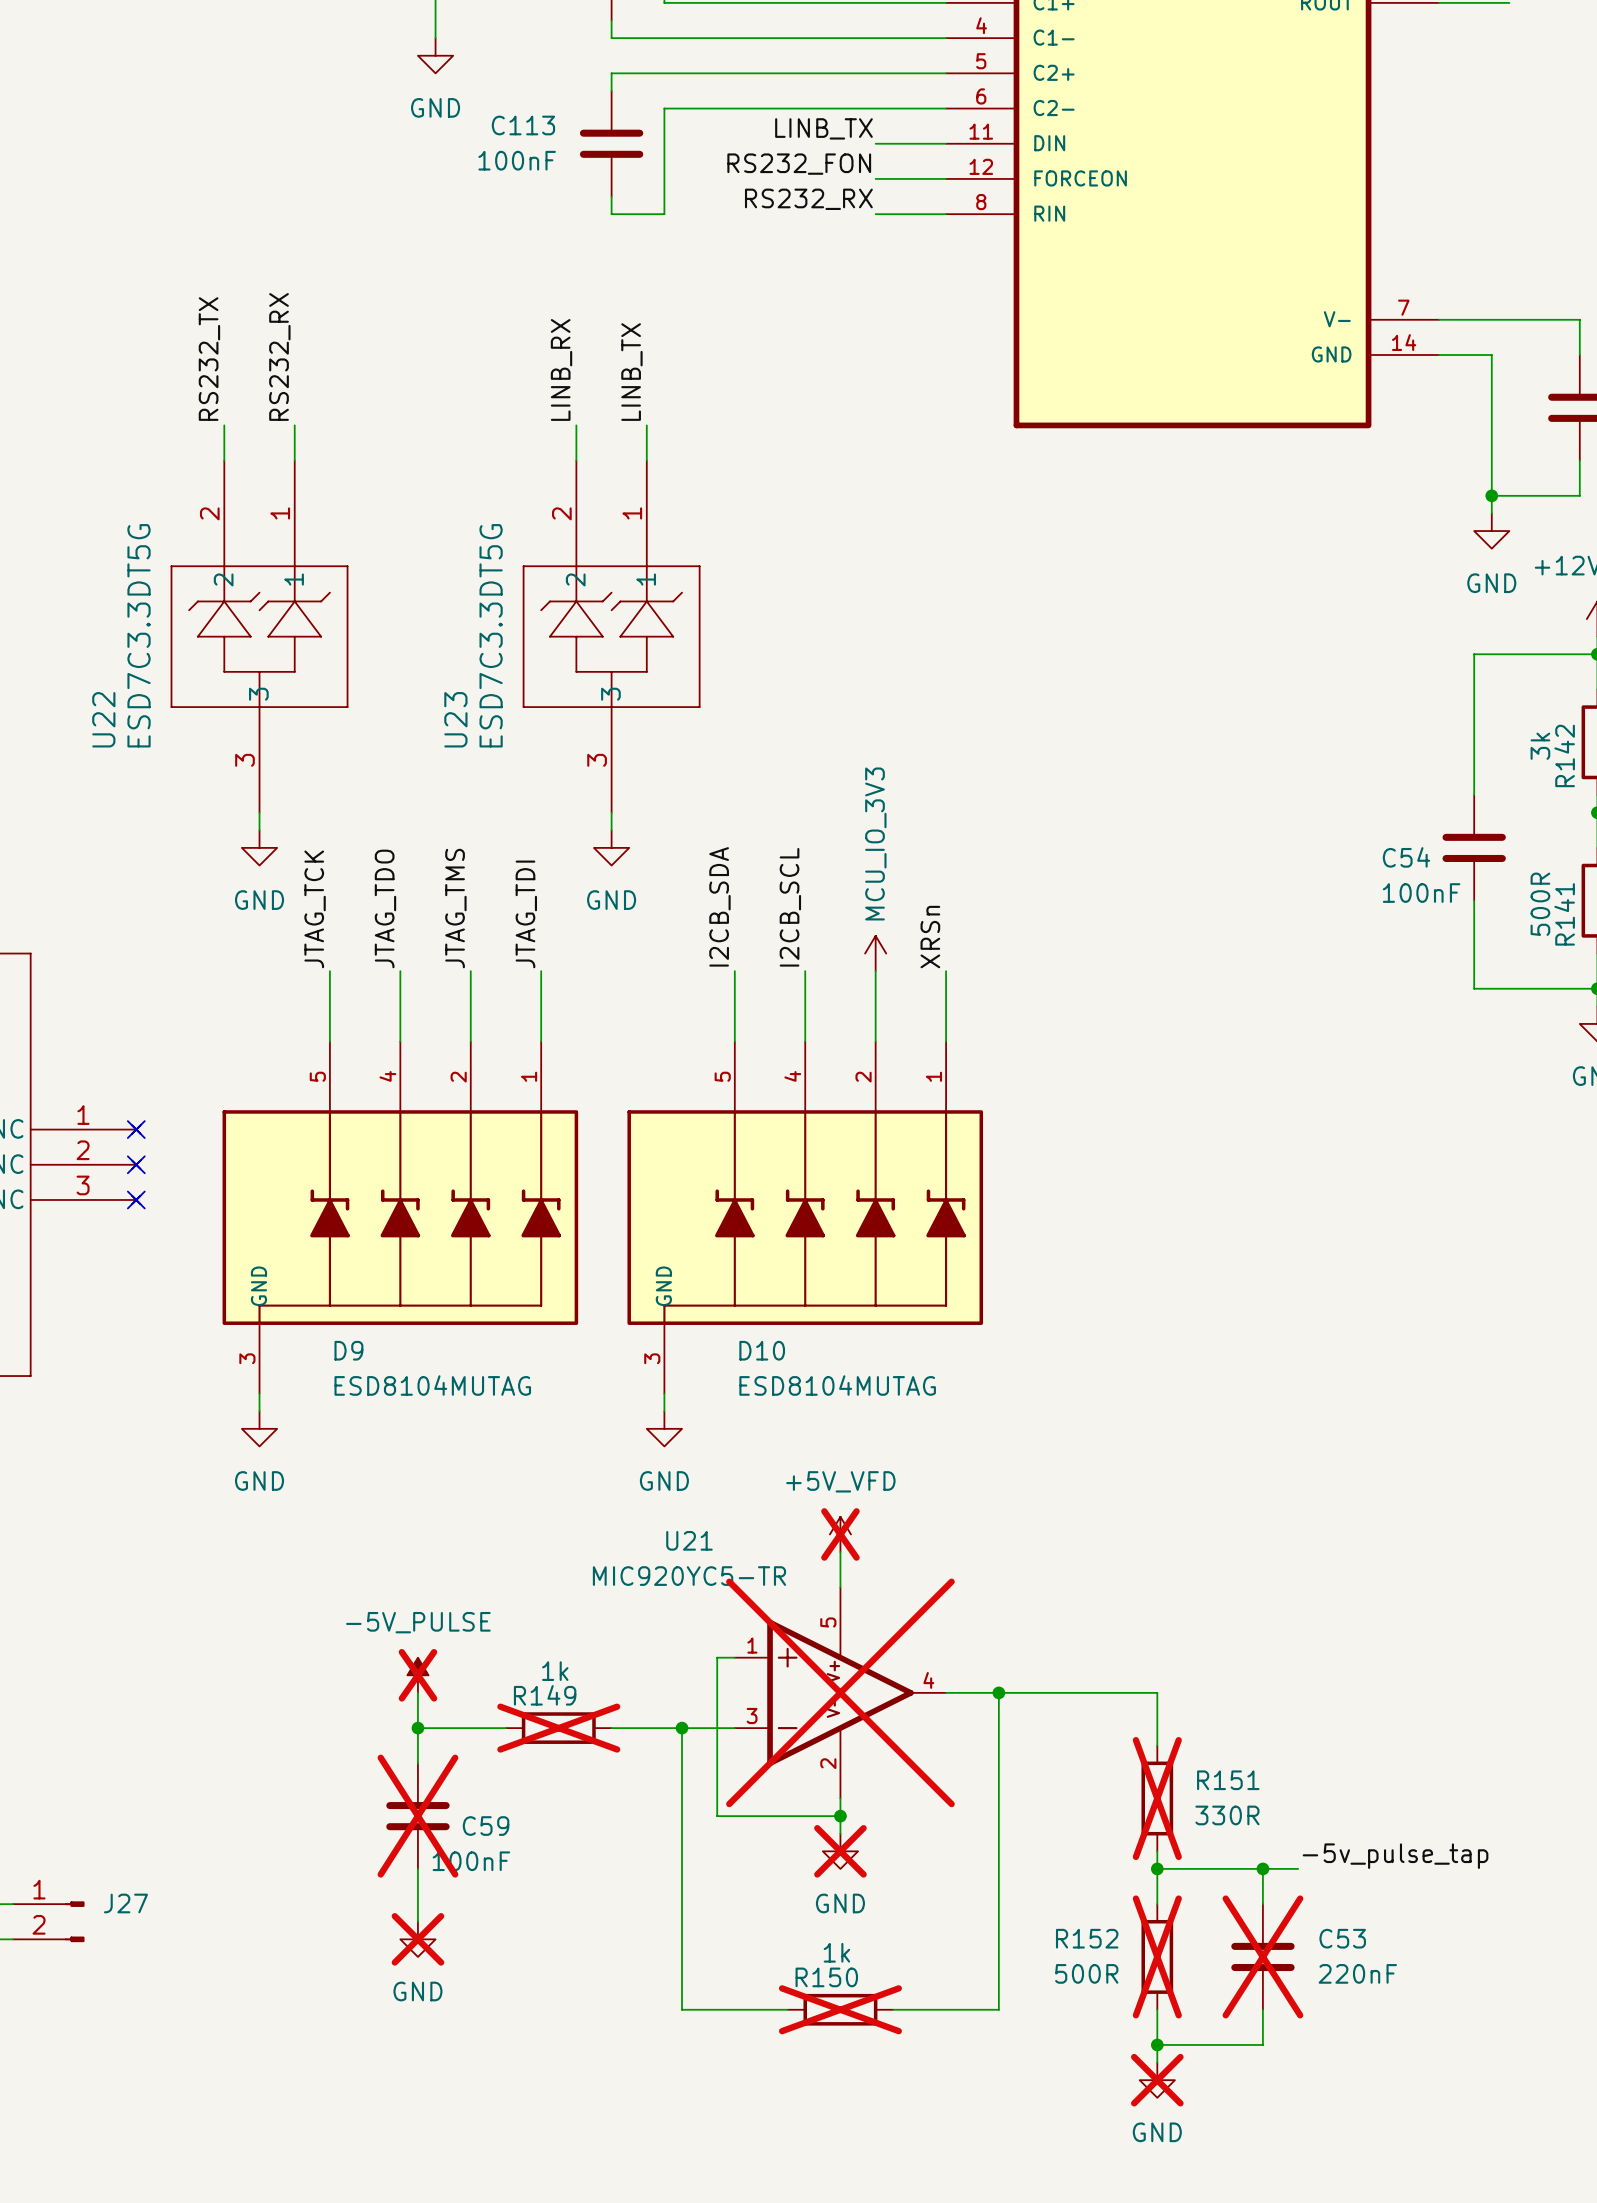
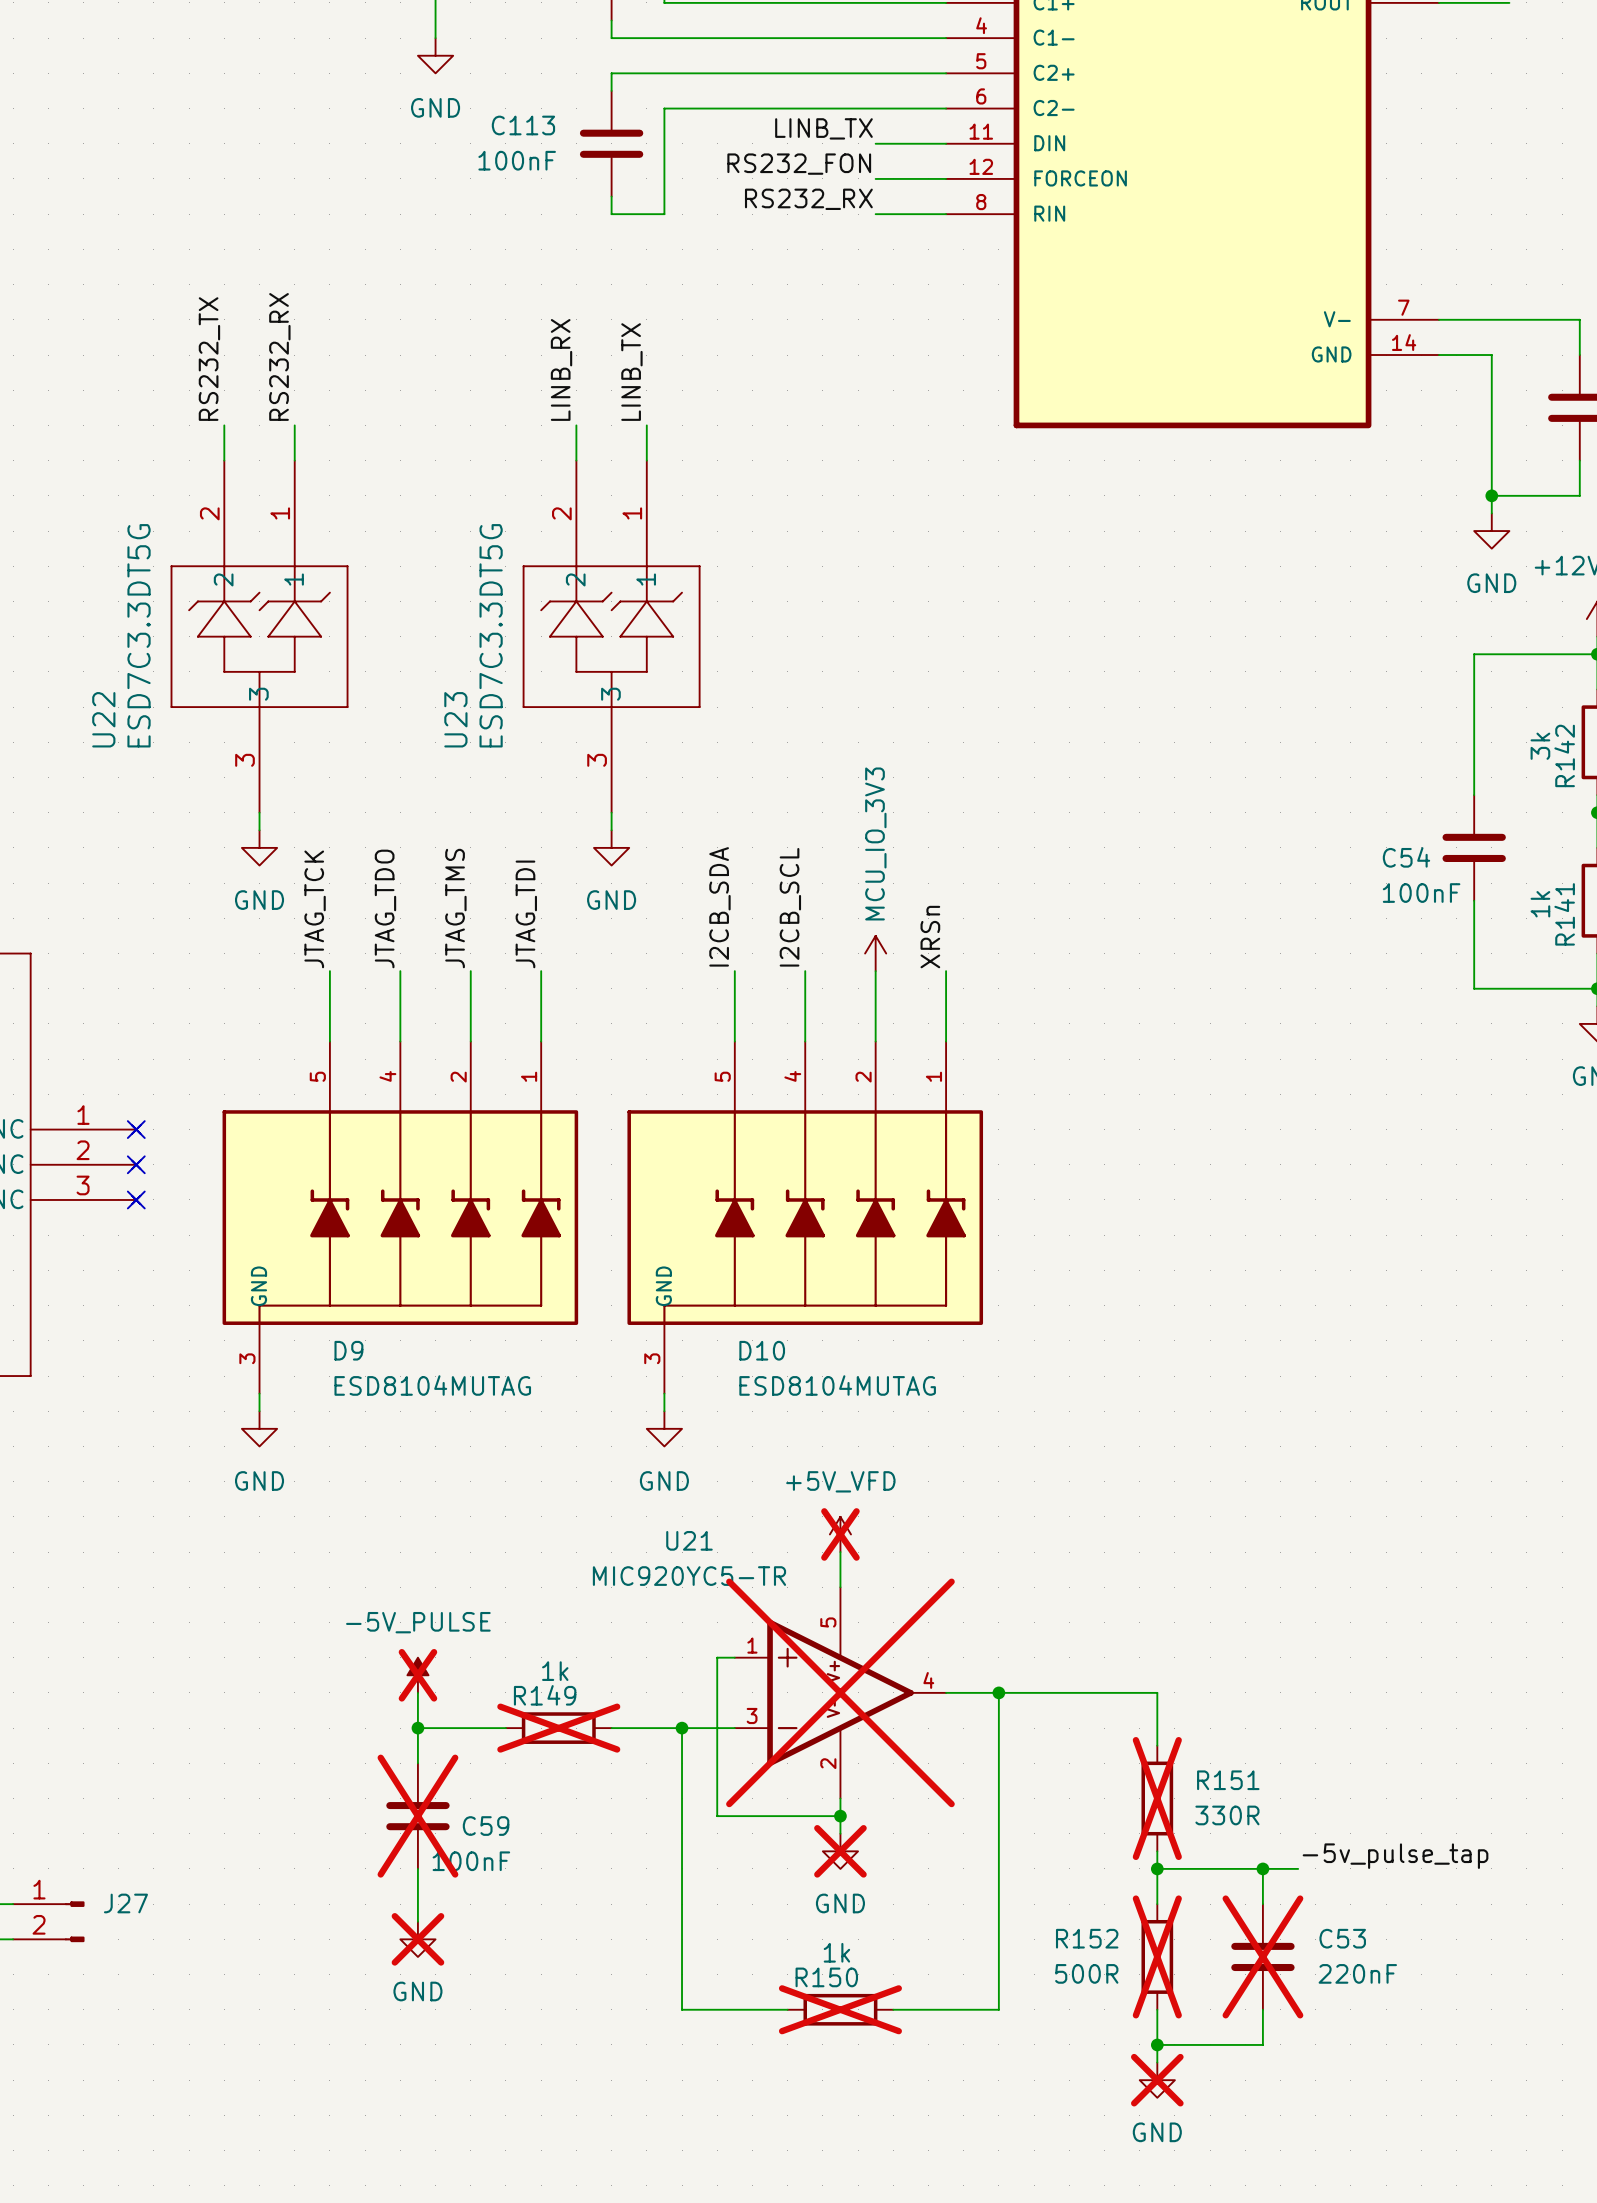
R141 value: 500R (1540, 904) -> 1k (1540, 904)

